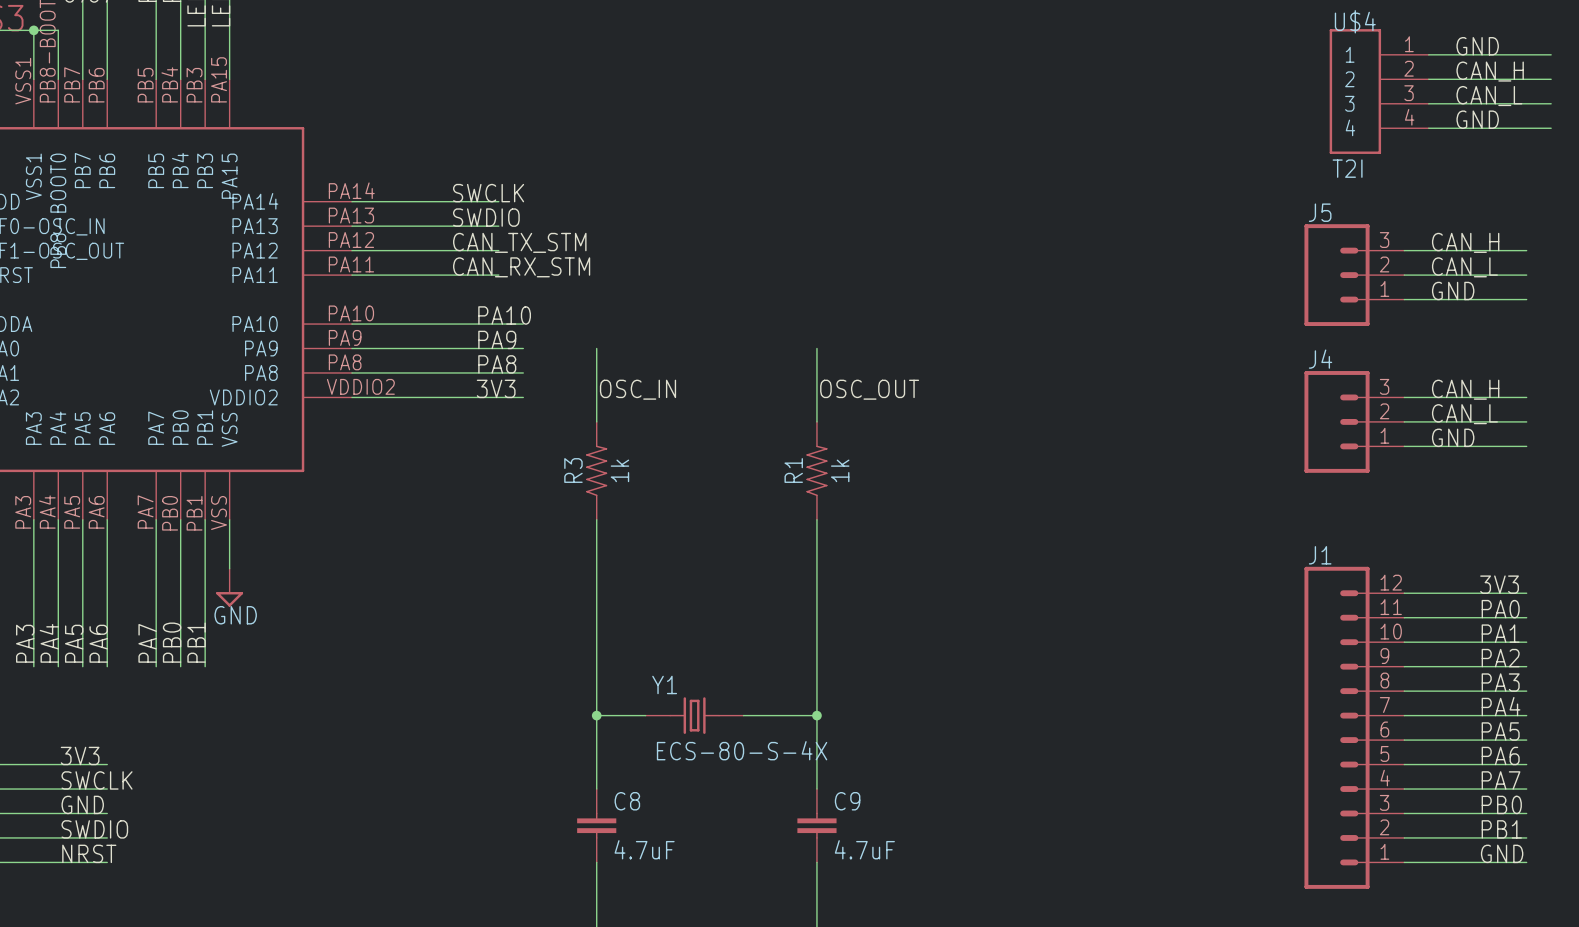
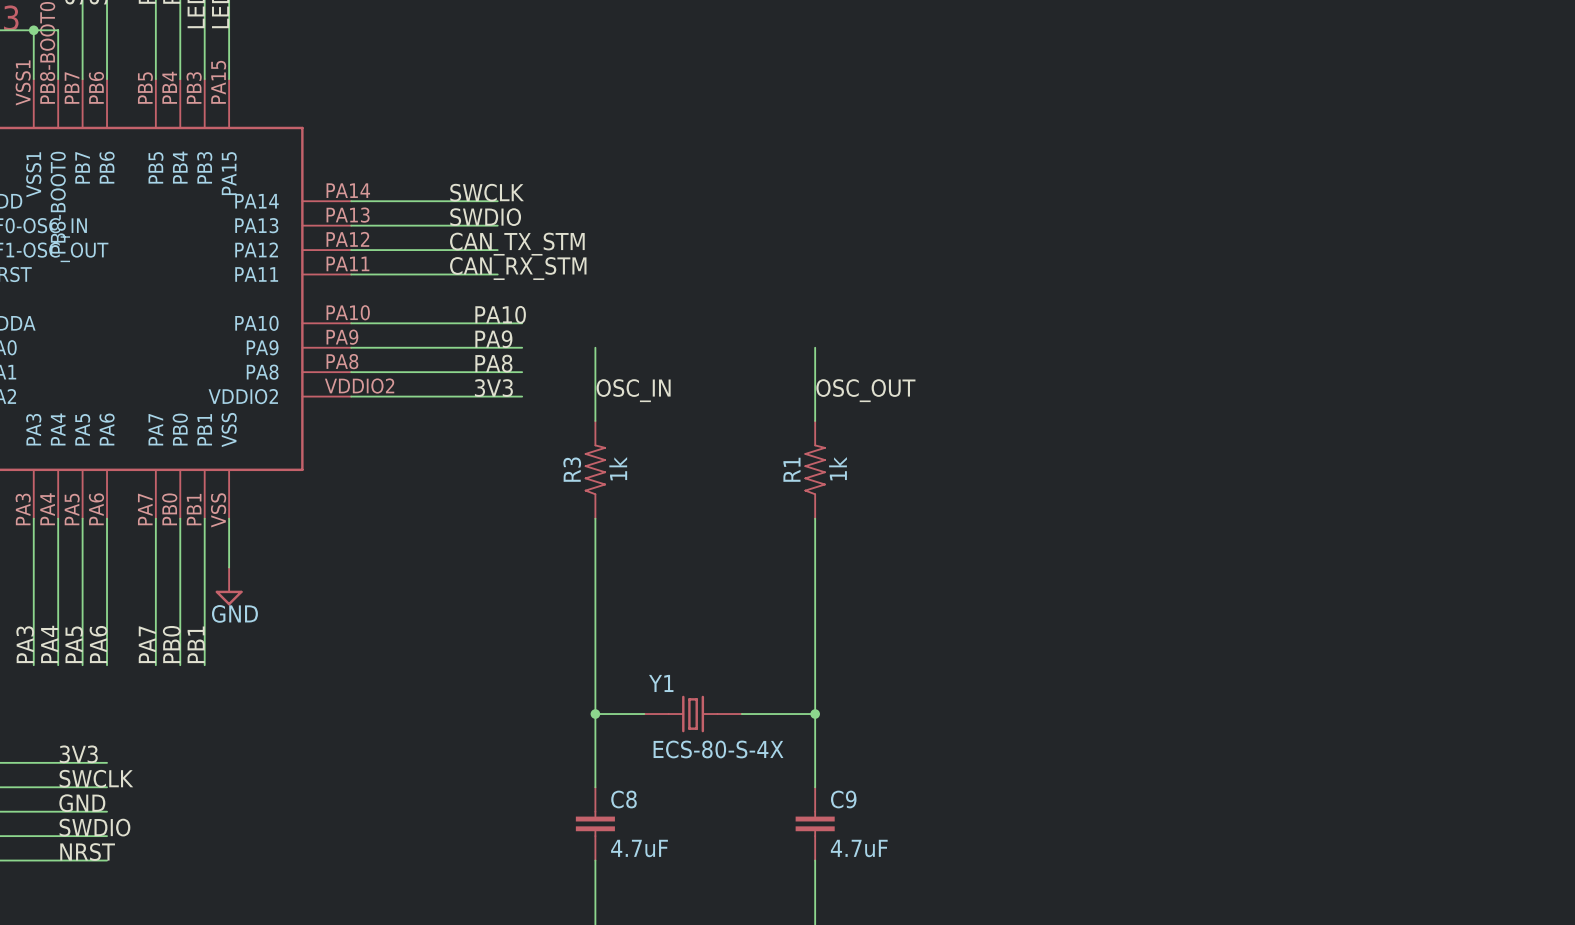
label: GND (1477, 46) -> none
wire: (1428, 54) (1551, 54) -> none
label: CAN_H (1490, 71) -> none
wire: (1428, 79) (1551, 79) -> none
U$4: T2I (1379, 91) -> none
label: CAN_L (1489, 96) -> none
wire: (1428, 103) (1551, 103) -> none
label: GND (1477, 119) -> none
wire: (1428, 128) (1551, 128) -> none
label: CAN_H (1465, 242) -> none
wire: (1404, 250) (1526, 250) -> none
label: CAN_L (1464, 267) -> none
J5: (1354, 275) -> none
wire: (1404, 275) (1526, 275) -> none
label: GND (1453, 291) -> none
wire: (1404, 299) (1526, 299) -> none
label: CAN_H (1465, 389) -> none
wire: (1404, 397) (1526, 397) -> none
label: CAN_L (1464, 414) -> none
J4: (1354, 421) -> none
wire: (1404, 421) (1526, 421) -> none
label: GND (1453, 437) -> none
wire: (1404, 446) (1526, 446) -> none
label: 3V3 (1499, 584) -> none
wire: (1404, 593) (1526, 593) -> none
label: PA0 (1500, 609) -> none
wire: (1404, 617) (1526, 617) -> none
label: PA1 (1500, 633) -> none
wire: (1404, 642) (1526, 642) -> none
label: PA2 (1500, 658) -> none
wire: (1404, 666) (1526, 666) -> none
label: PA3 (1500, 682) -> none
wire: (1404, 691) (1526, 691) -> none
label: PA4 (1501, 706) -> none
wire: (1404, 715) (1526, 715) -> none
J1: (1354, 727) -> none
label: PA5 (1500, 731) -> none
wire: (1404, 740) (1526, 740) -> none
label: PA6 (1500, 755) -> none
wire: (1404, 764) (1526, 764) -> none
label: PA7 (1501, 780) -> none
wire: (1404, 789) (1526, 789) -> none
label: PB0 (1501, 804) -> none
wire: (1404, 813) (1526, 813) -> none
label: PB1 (1501, 829) -> none
wire: (1404, 837) (1526, 837) -> none
label: GND (1502, 853) -> none
wire: (1404, 862) (1526, 862) -> none

